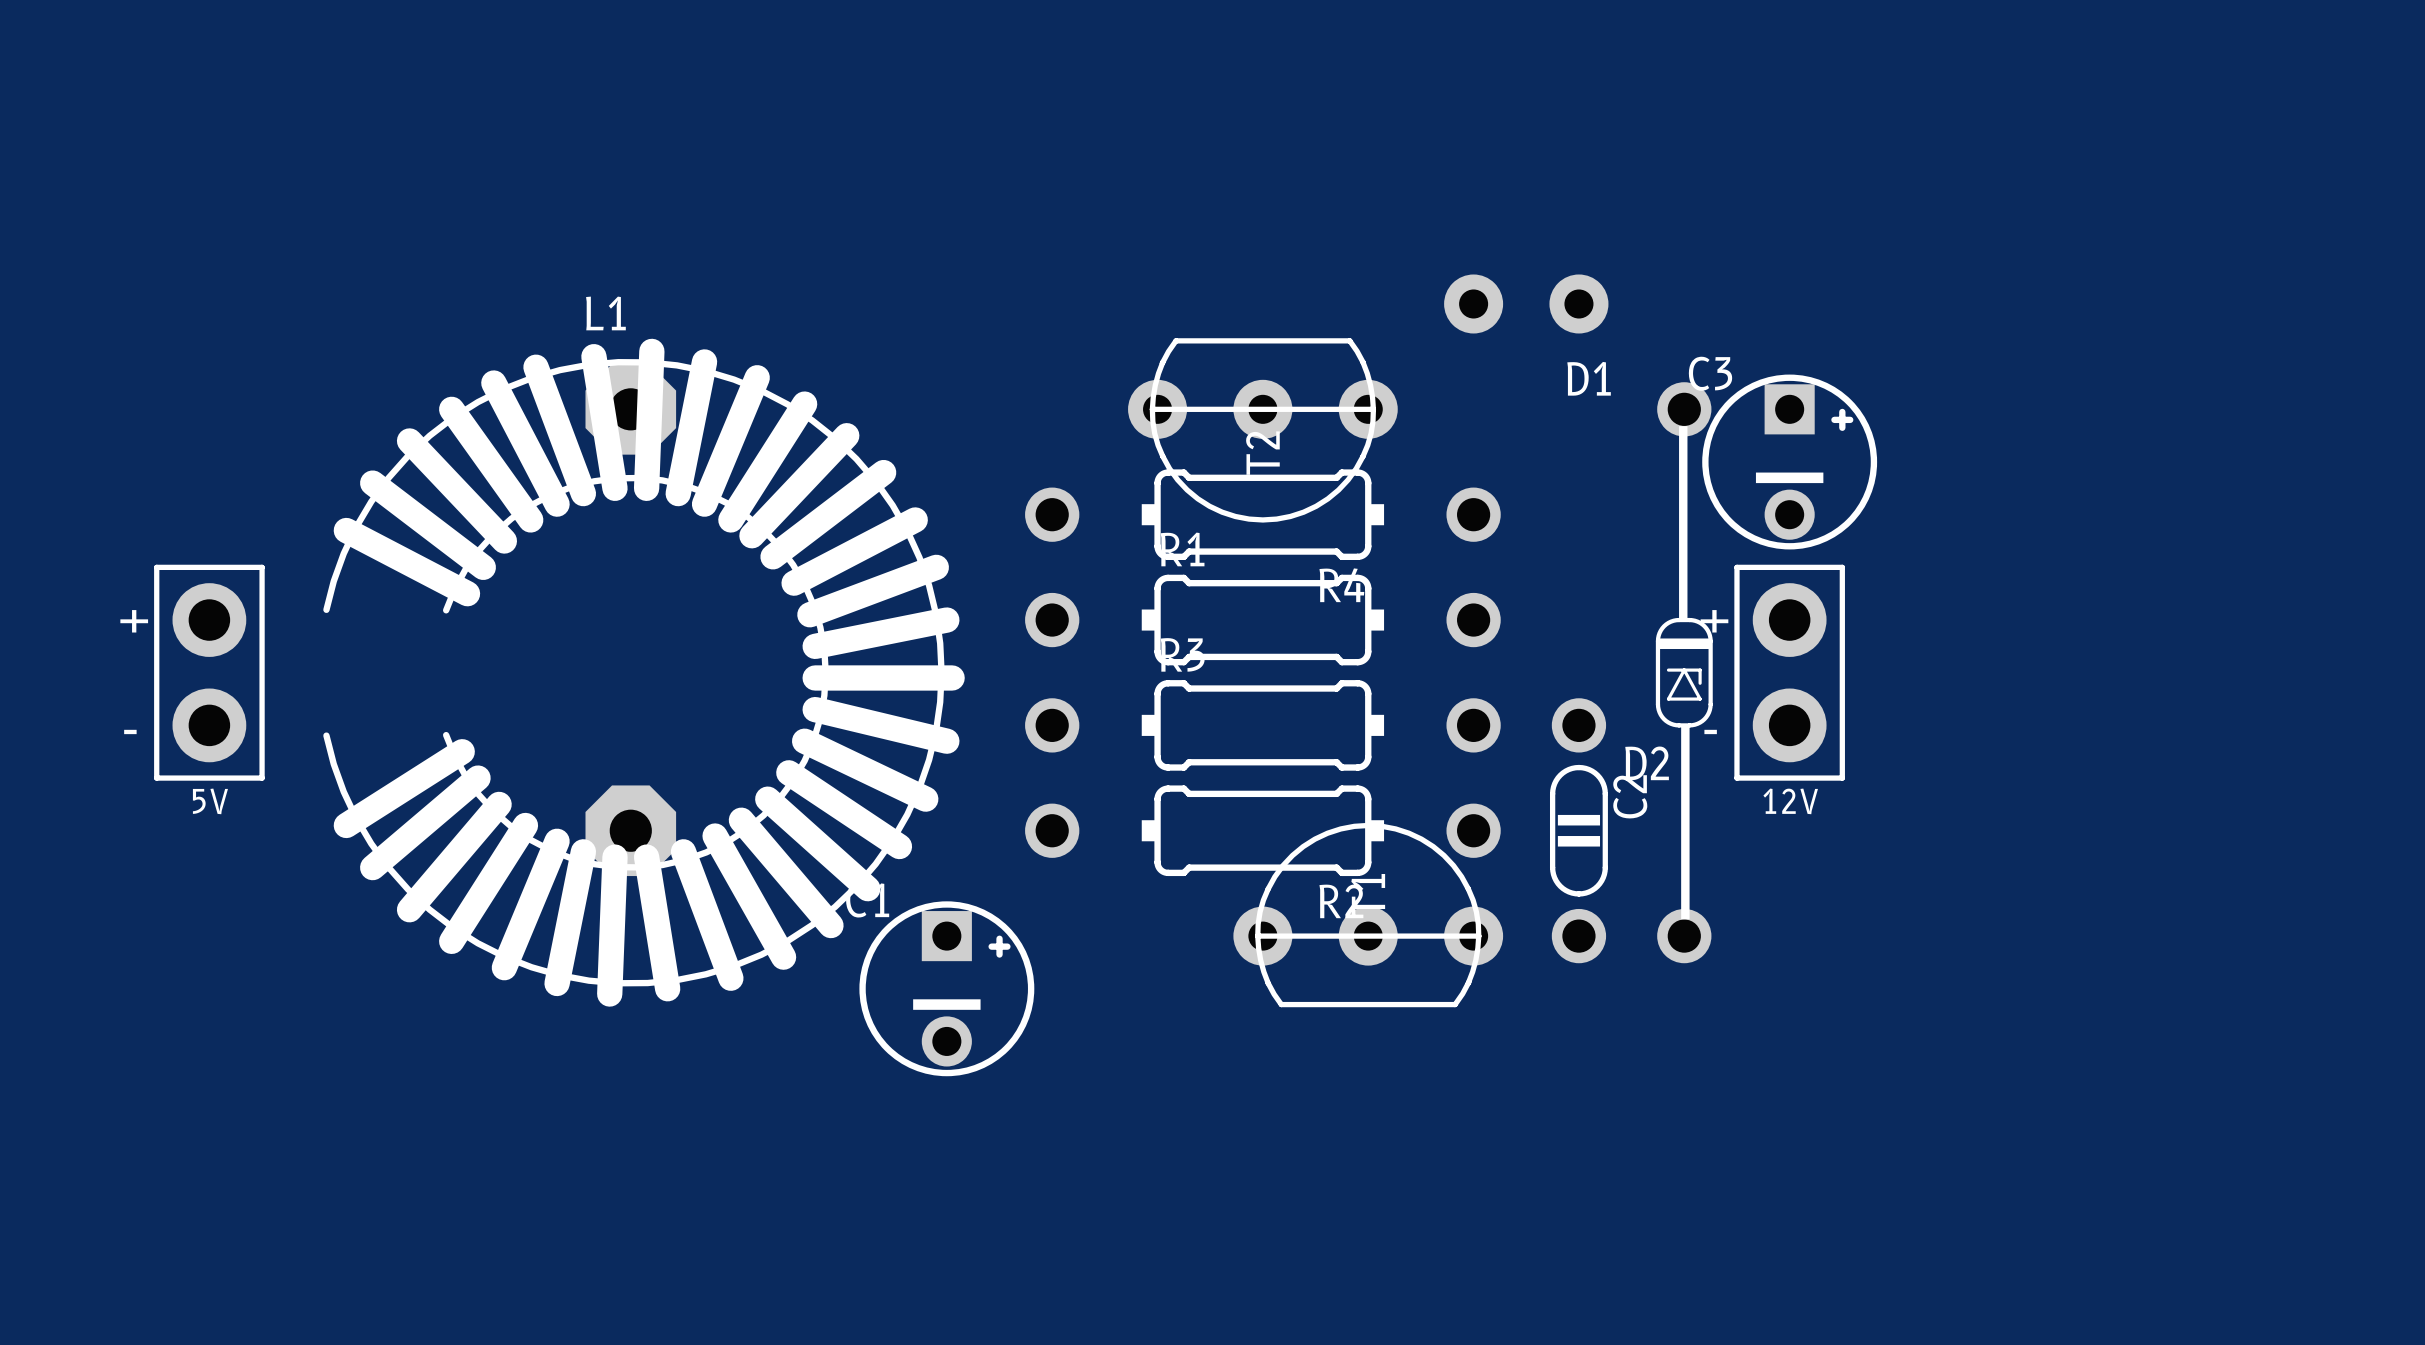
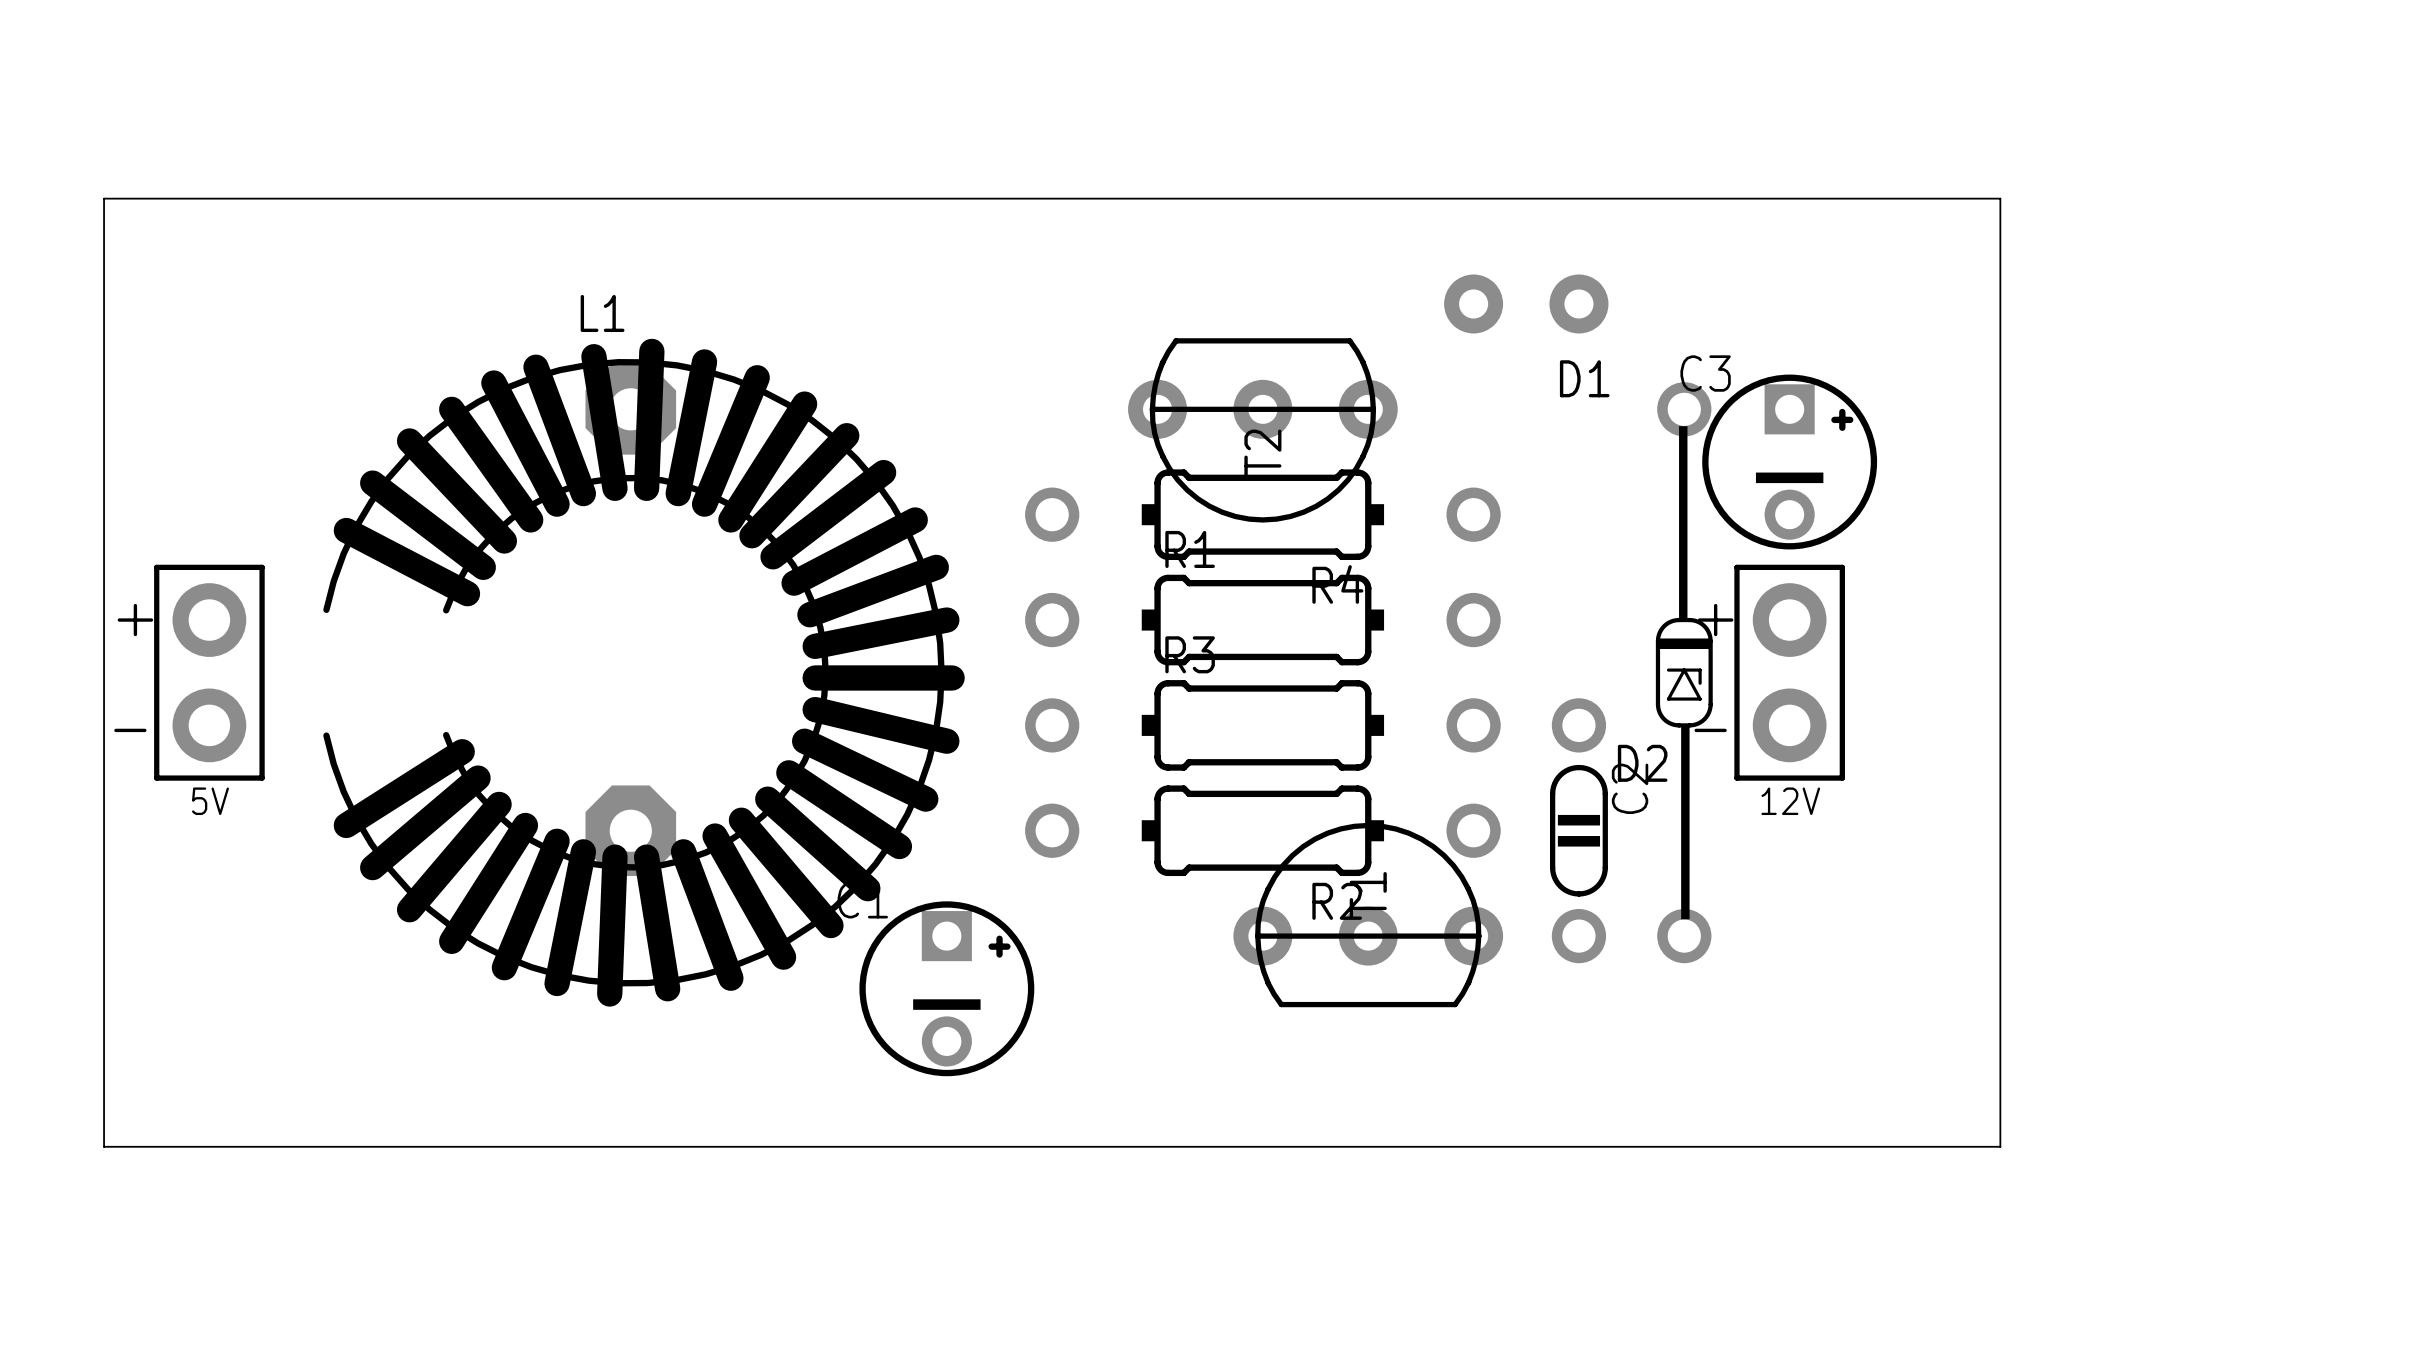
board edge: none -> (104, 198) (2000, 198) (2000, 1146) (104, 1146) (104, 198)

